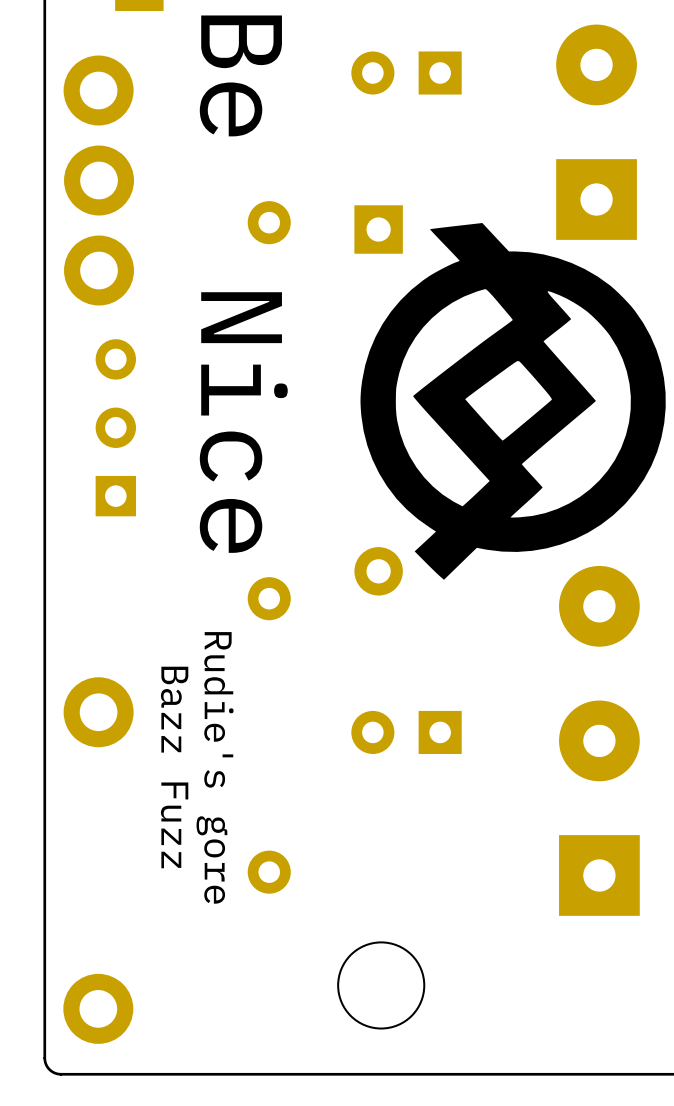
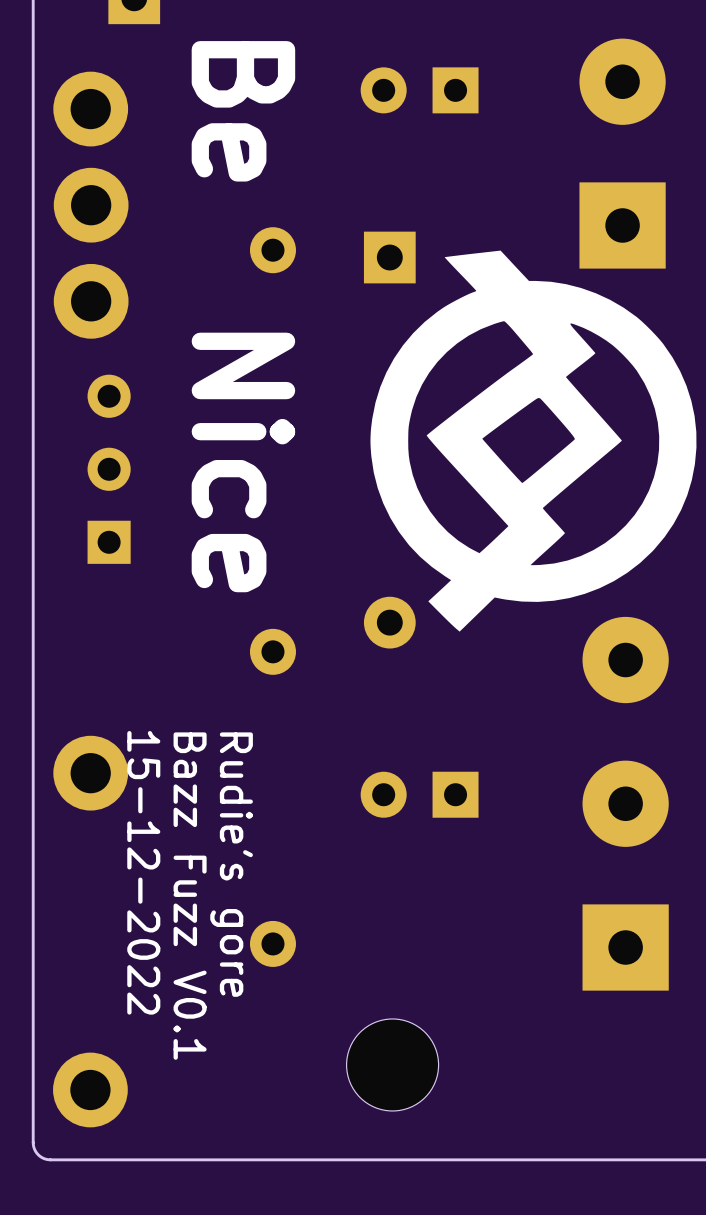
text: Bazz Fuzz (174, 767) -> Bazz Fuzz V0.1 (190, 896)
text position: Rudie's gore (215, 767) -> Rudie's gore (231, 864)
text: none -> 15-12-2022 (143, 872)

